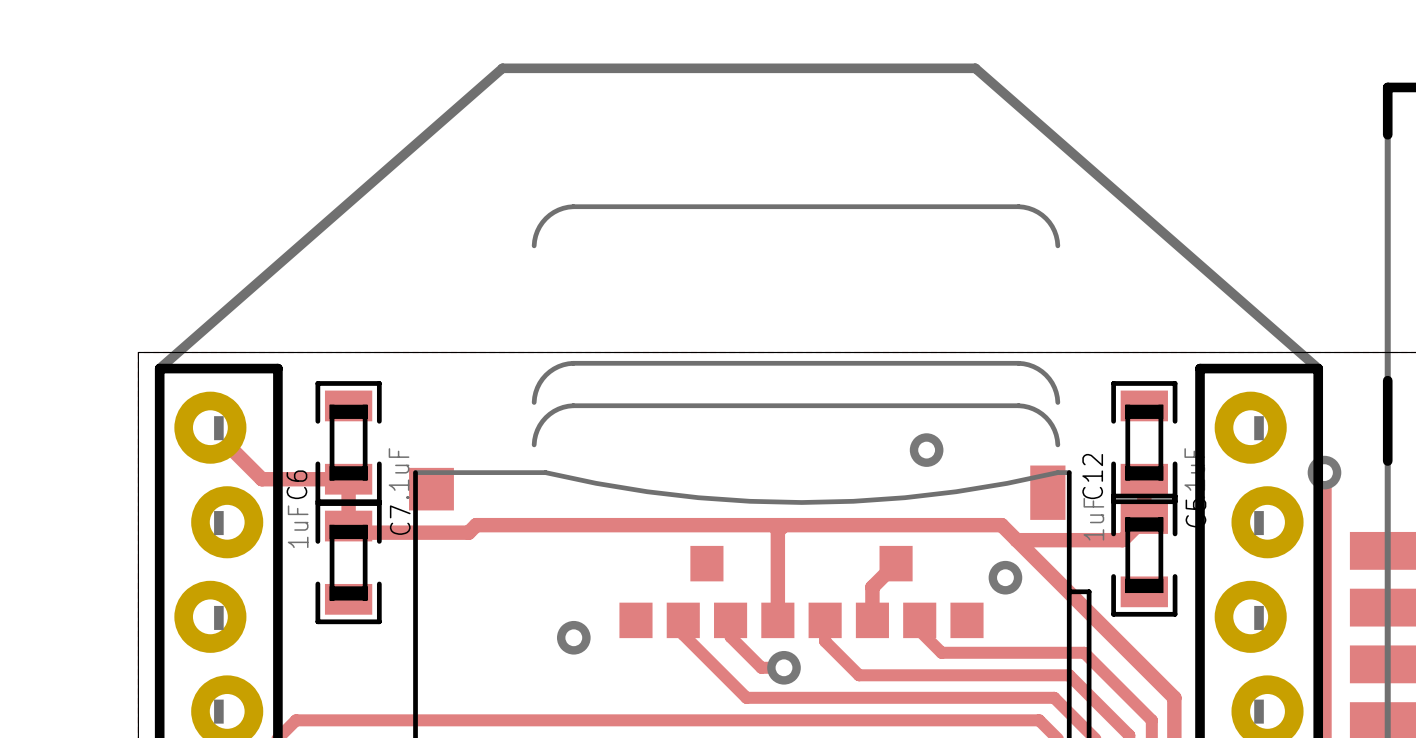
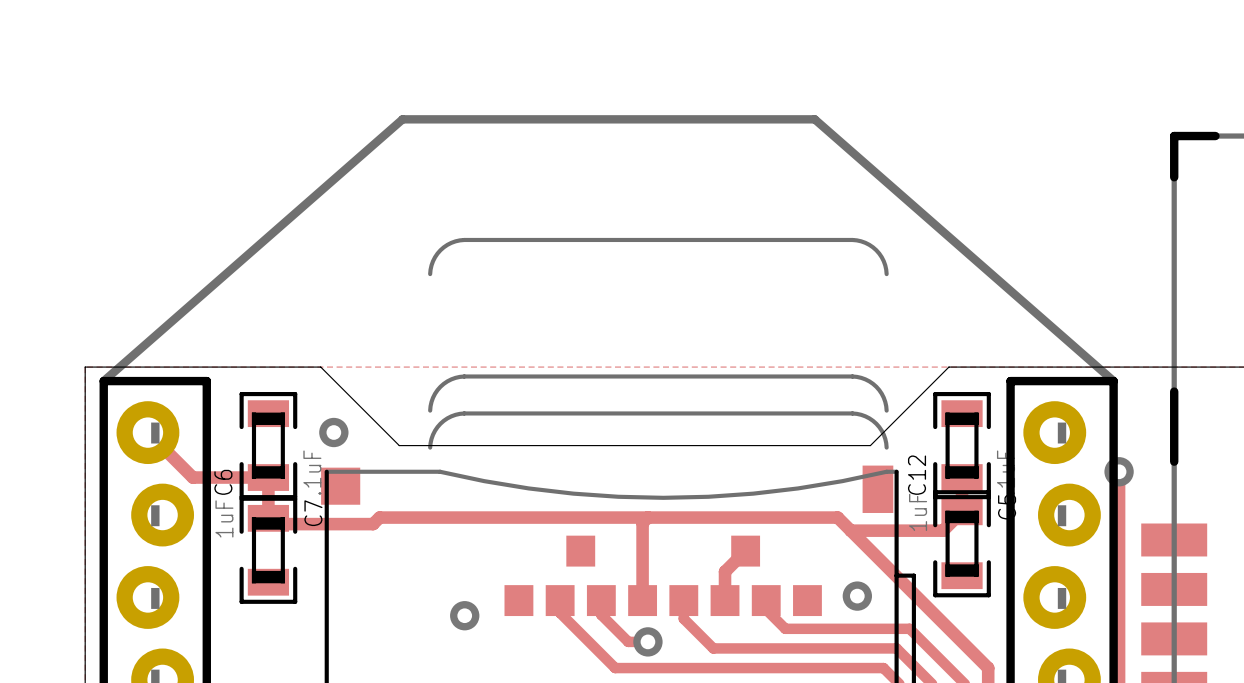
board edge: (408, 352) (1129, 352) -> (320, 367) (399, 445) (870, 445) (948, 367)
via: none -> (333, 432)
via: (926, 450) -> none
via position: (1005, 577) -> (857, 596)

